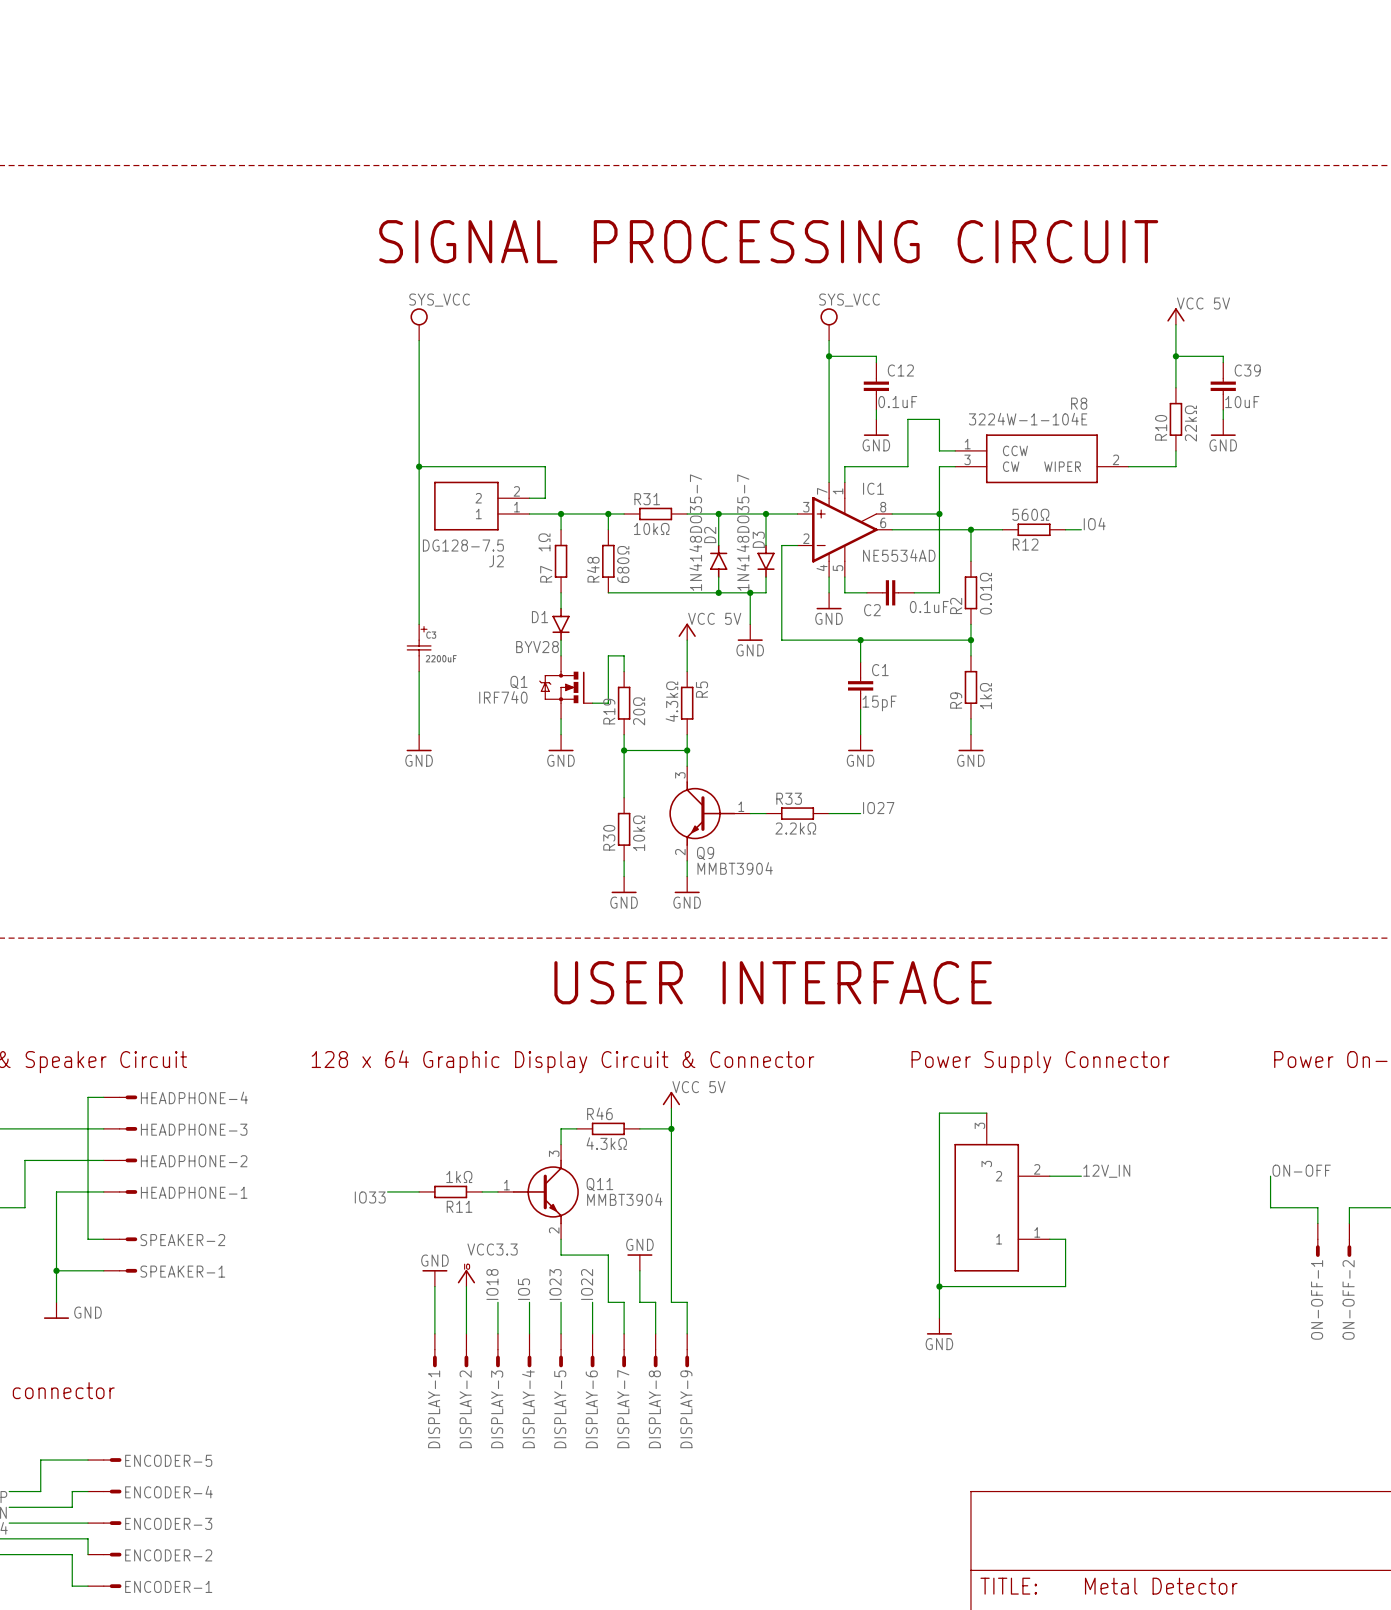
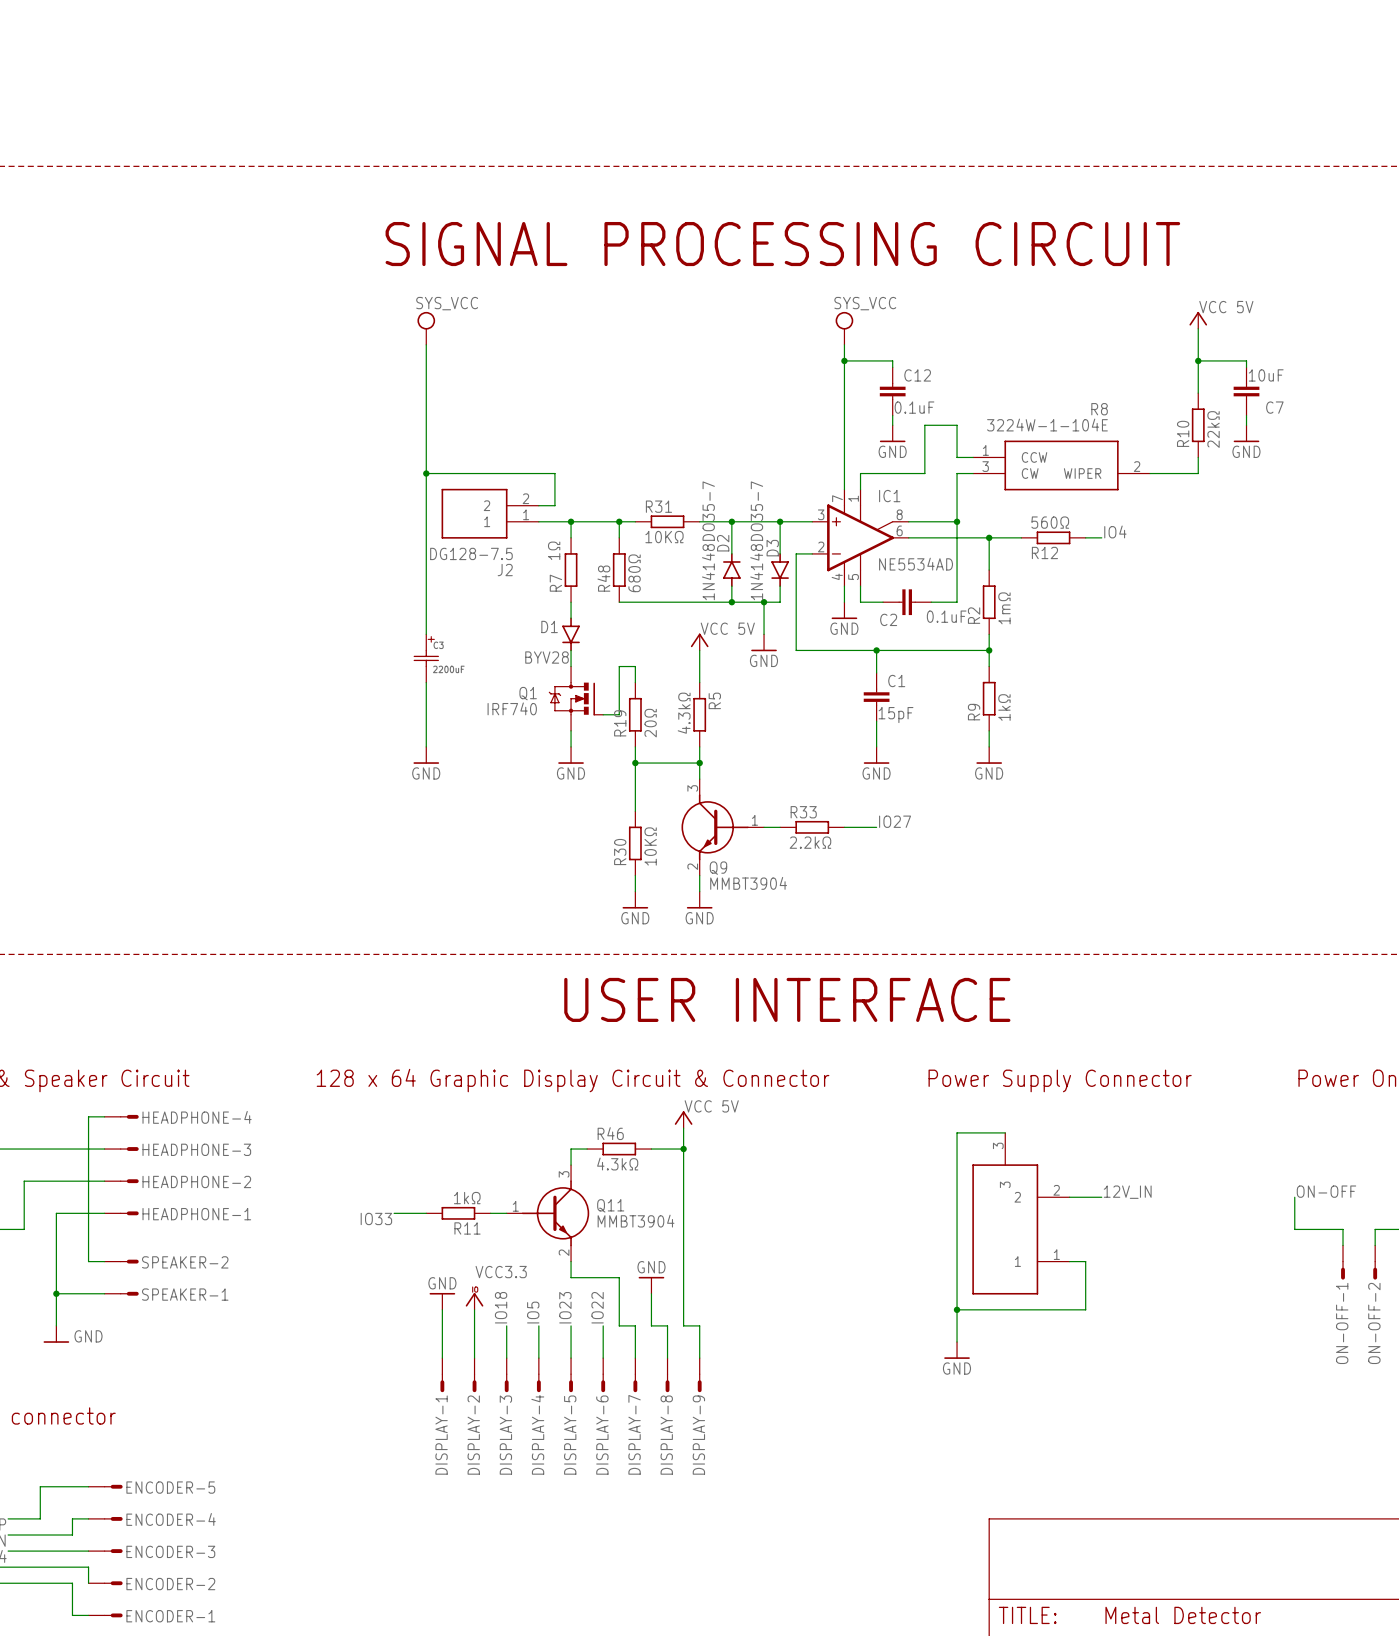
C39 name: C39 (1247, 370) -> C7 (1274, 407)
C39 value position: 10uF (1242, 402) -> 10uF (1266, 375)
R31 value: 10kΩ (651, 528) -> 10KΩ (664, 537)
R2 value: 0.01Ω (985, 593) -> 1mΩ (1004, 608)
R30 value: 10kΩ (639, 833) -> 10KΩ (650, 846)

